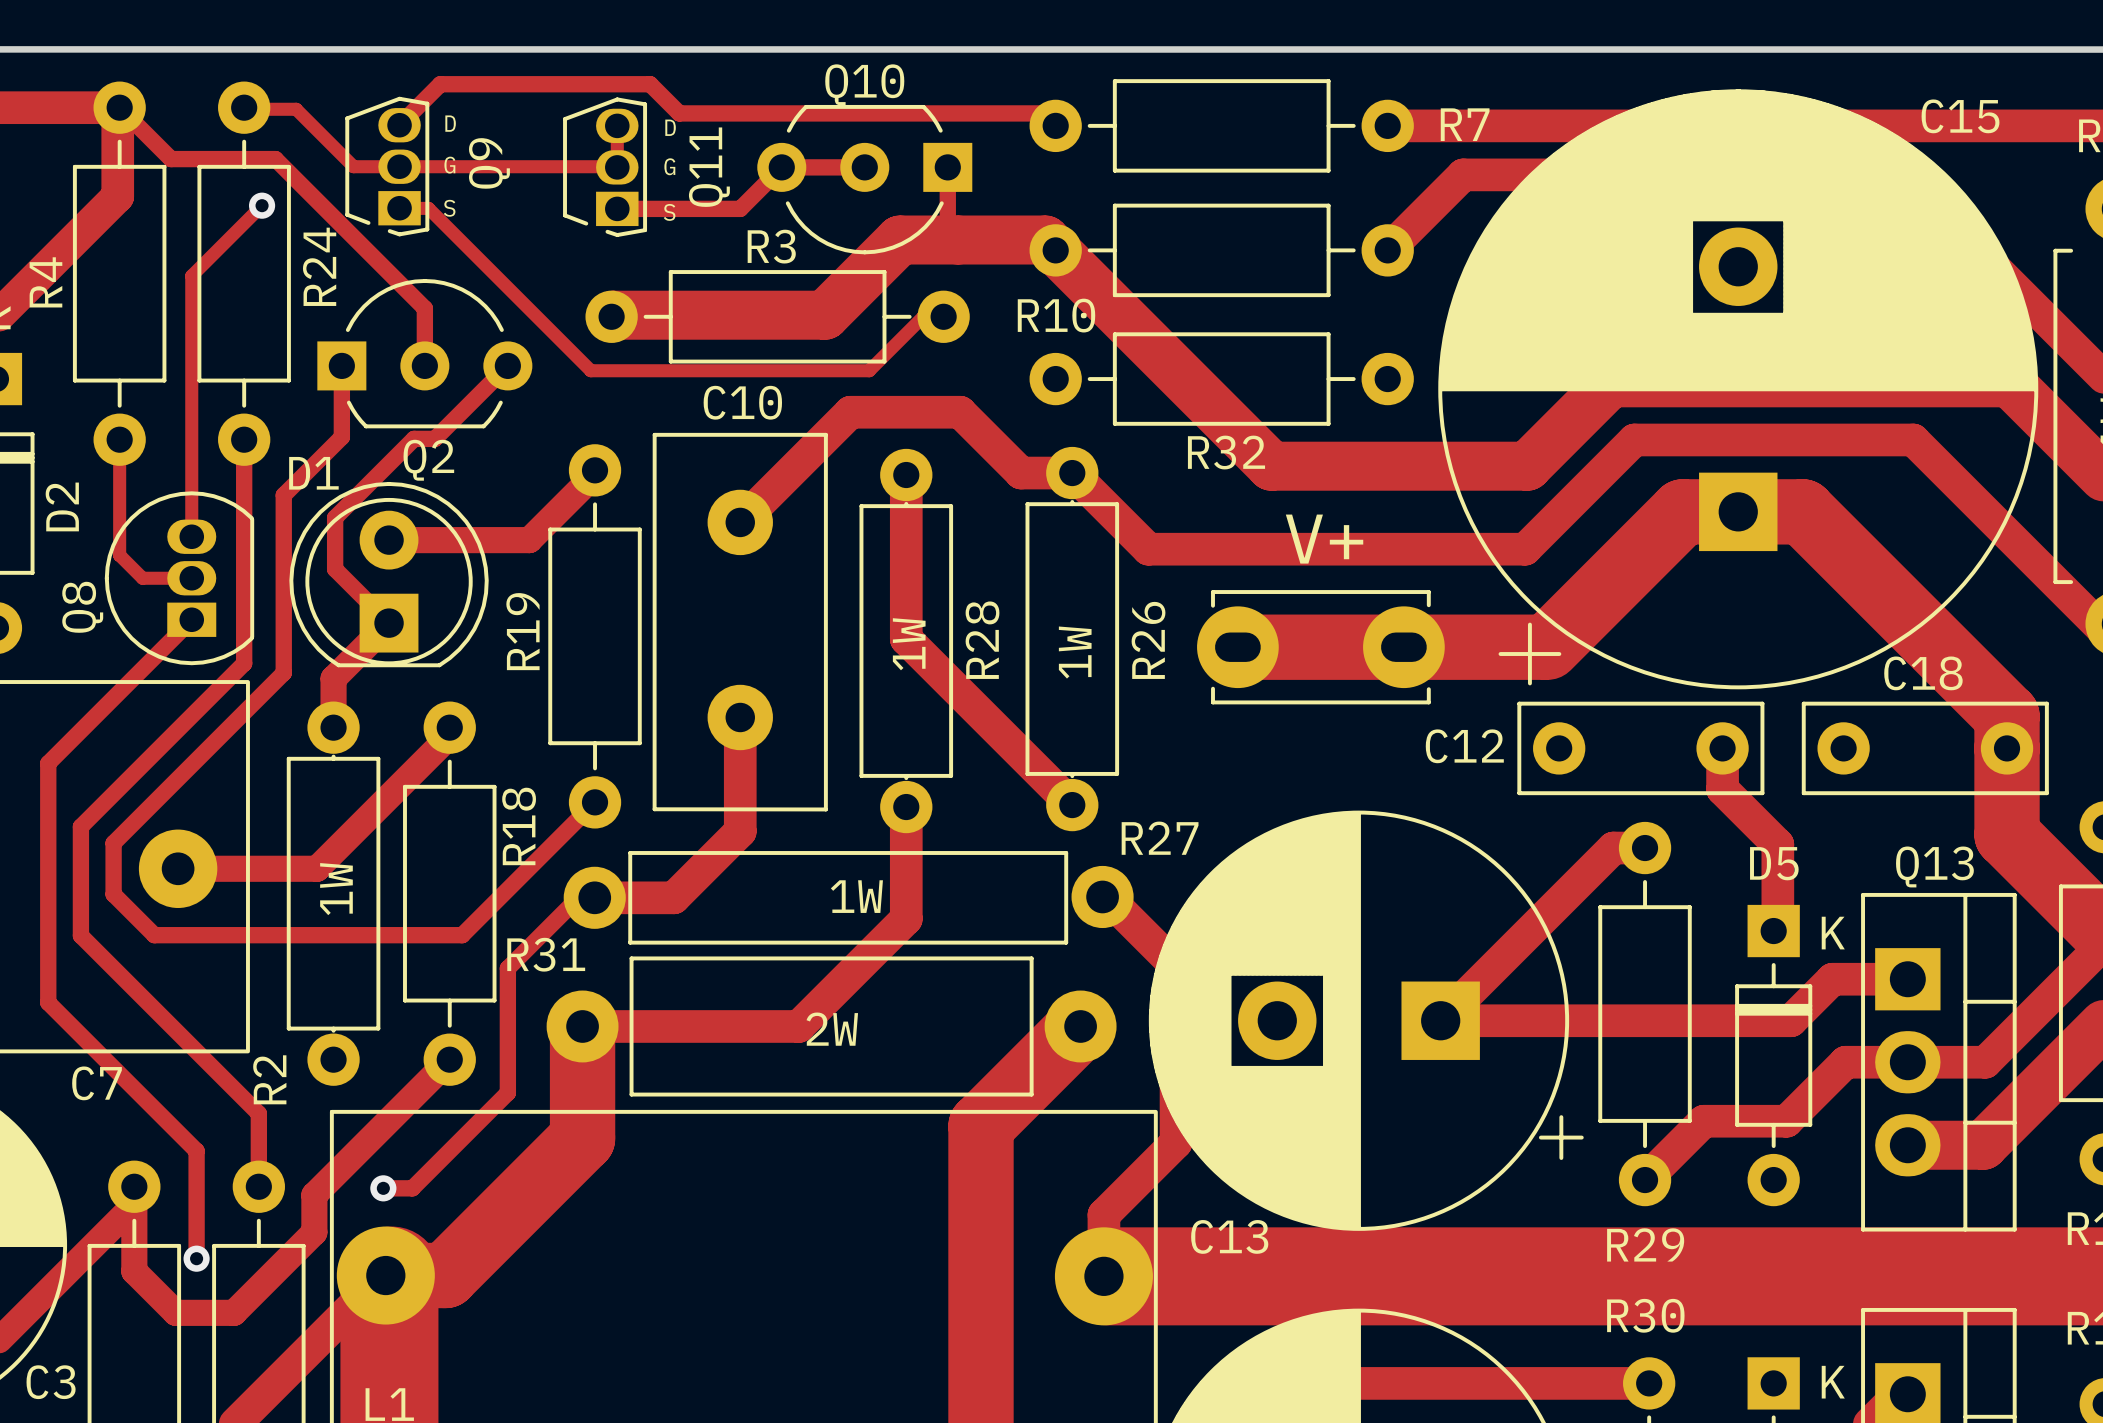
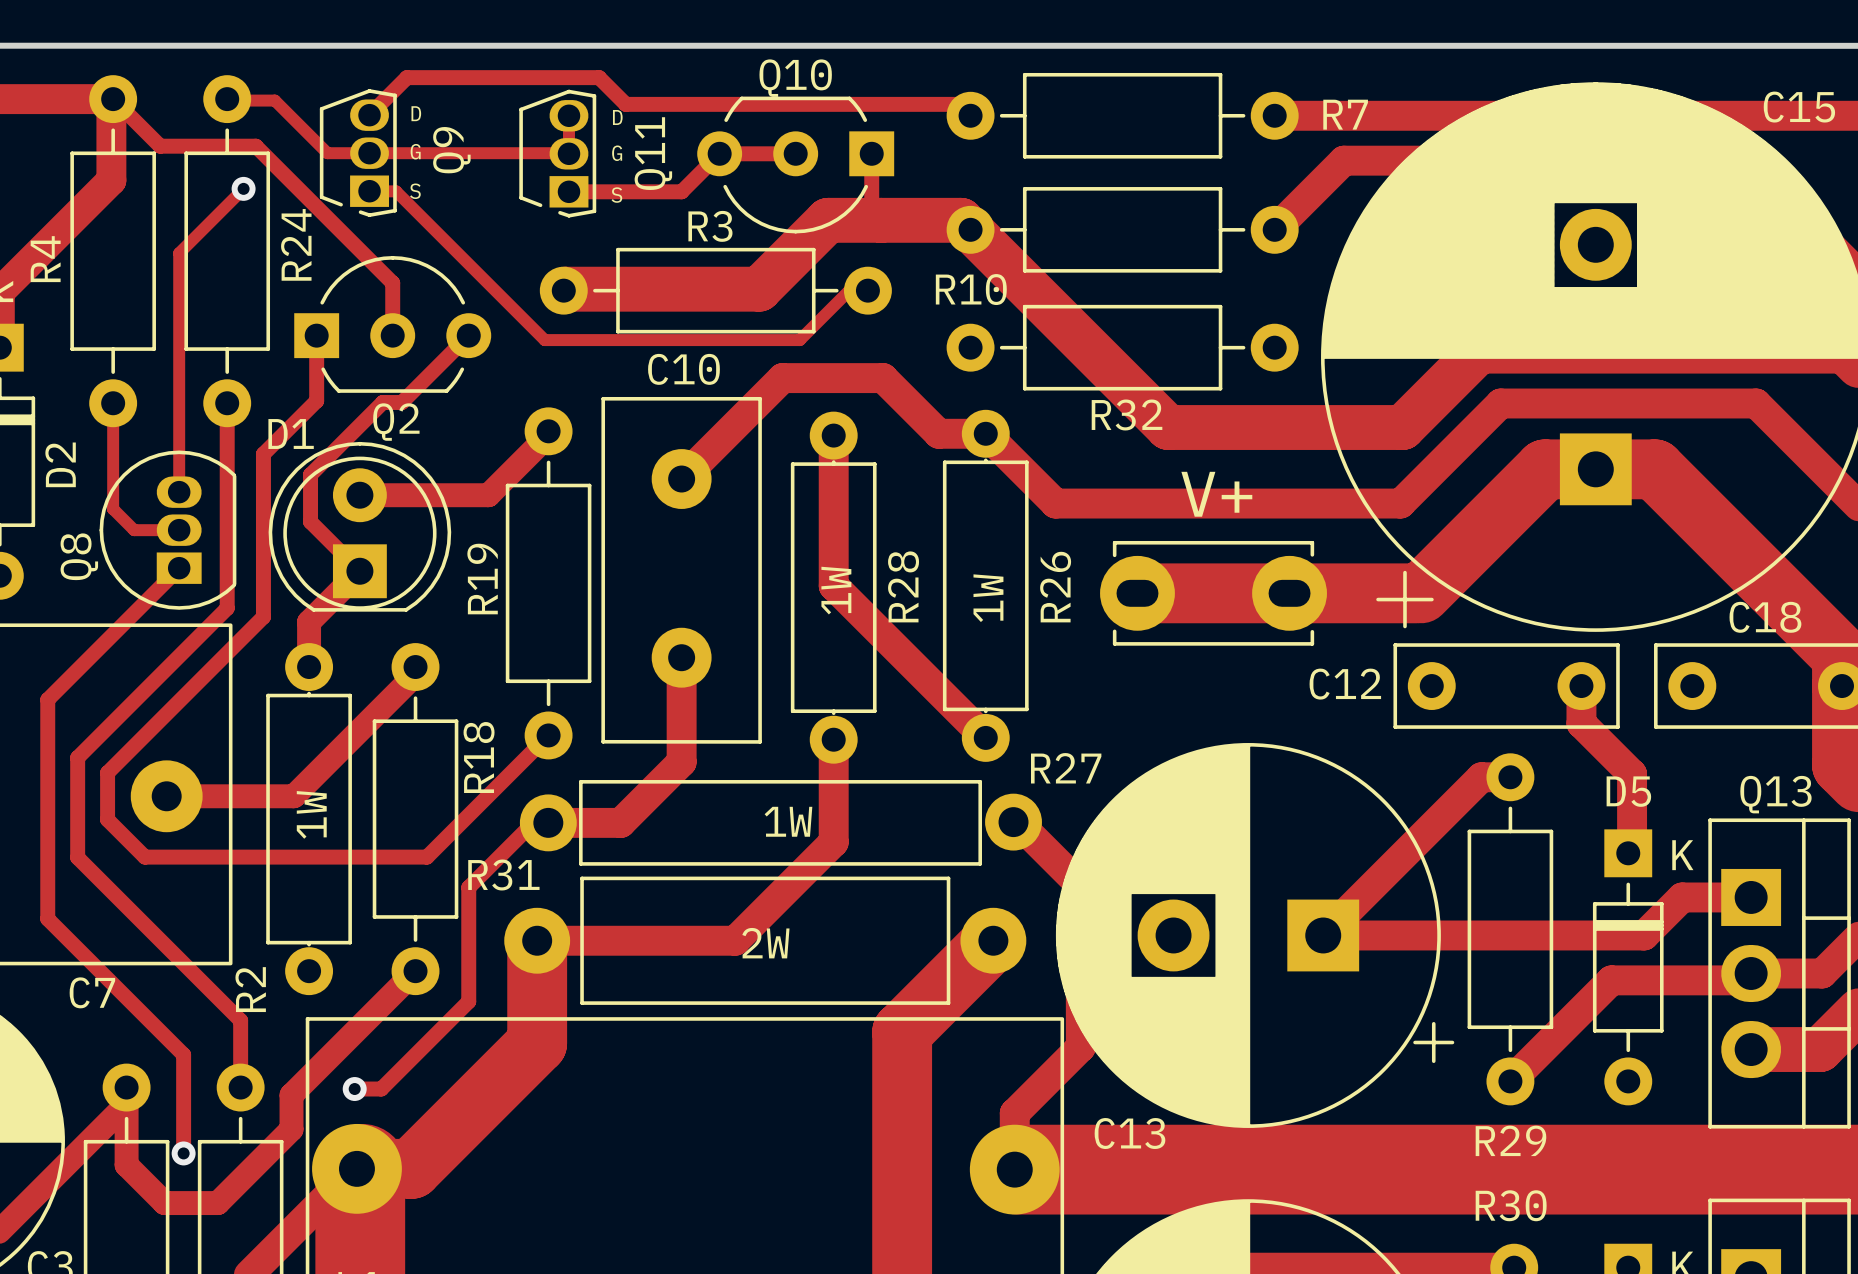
track: (1907, 1062) (1845, 1062) (1786, 1121) (1703, 1121) -> (1744, 980) (1611, 980) (1564, 1027)

